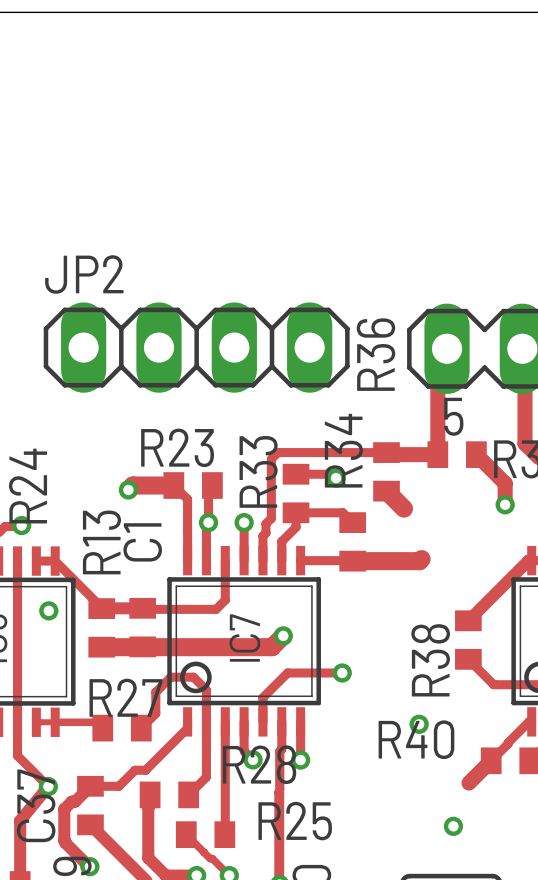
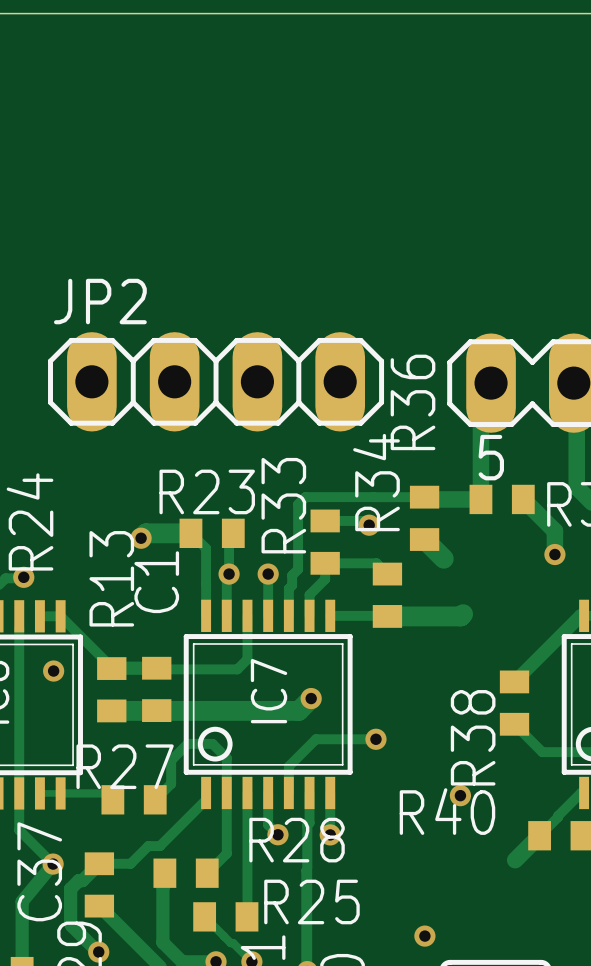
via position: (453, 826) -> (424, 936)

